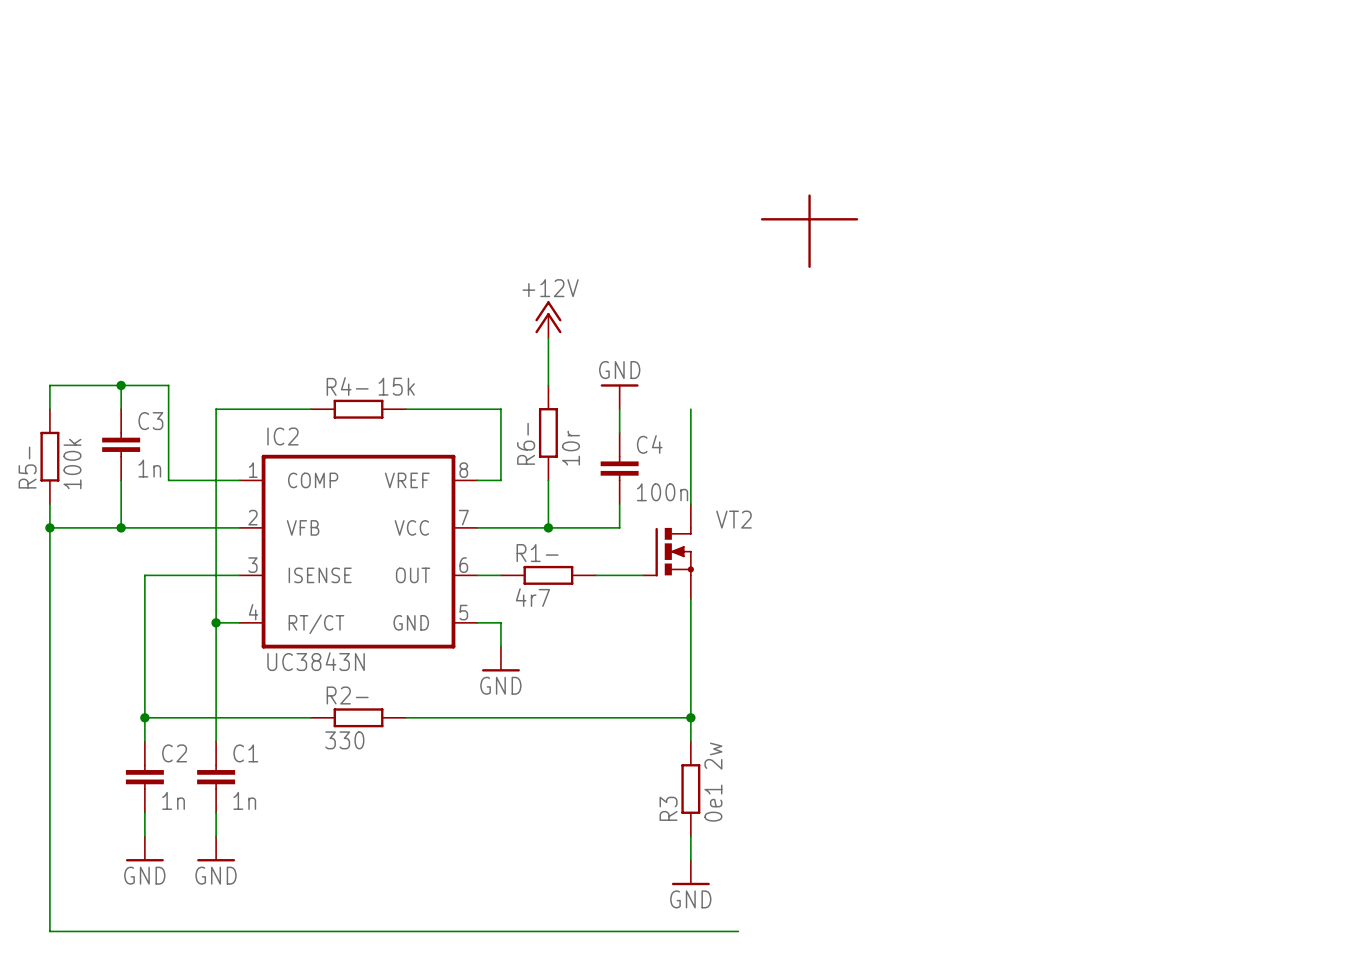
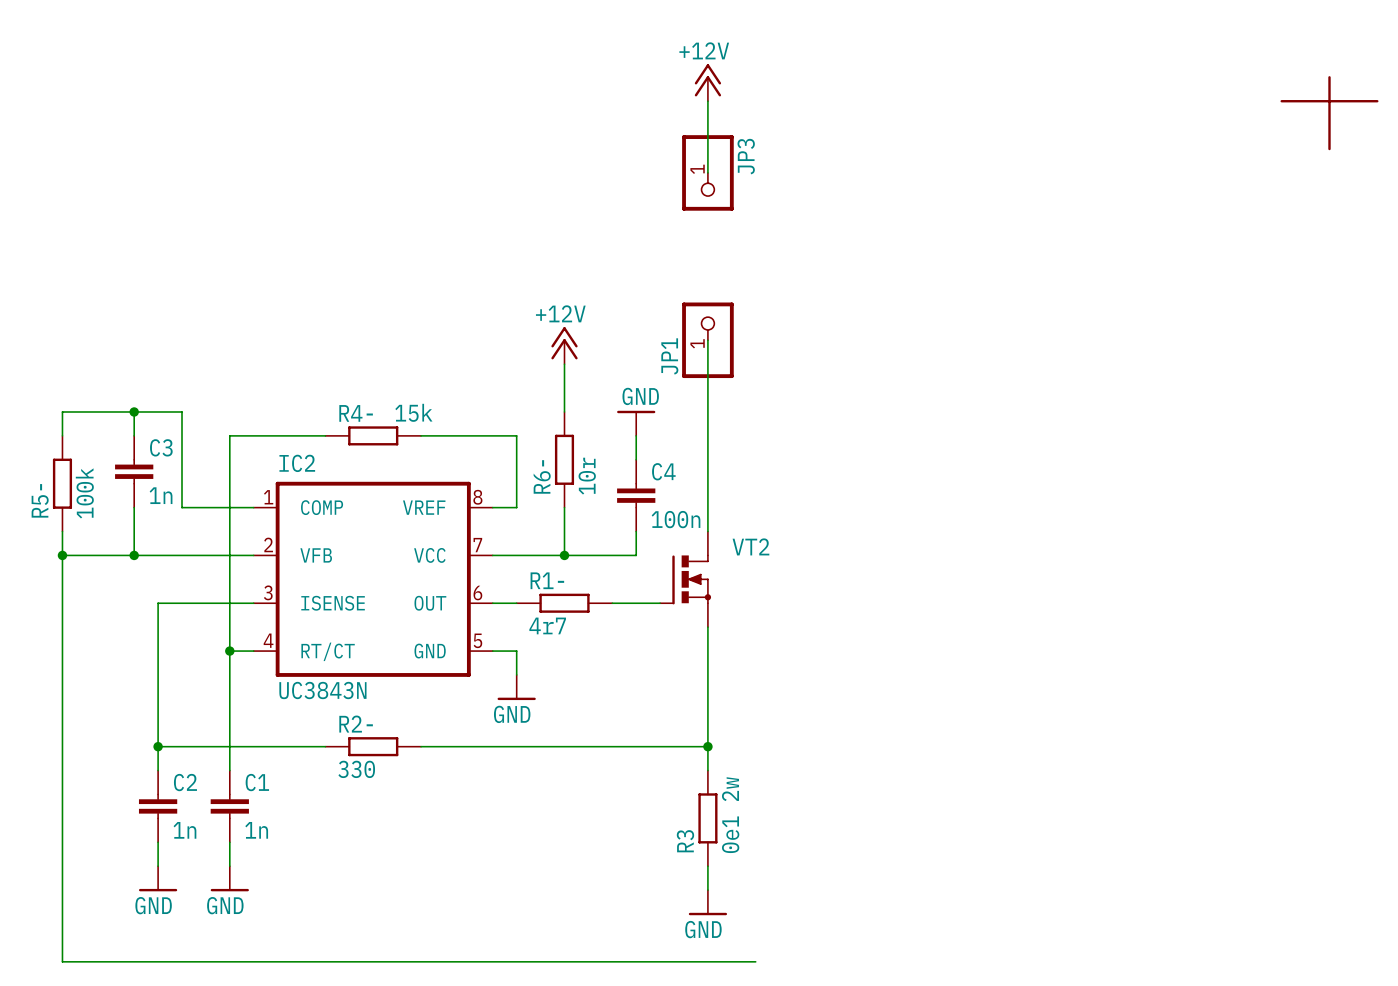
power symbol: none -> +12V (707, 82)
wire: none -> (707, 101) (707, 172)
part: none -> (1329, 113)
JP3: none -> (707, 172)
part: (809, 231) -> none
wire: none -> (707, 340) (707, 435)
JP1: none -> (707, 340)

